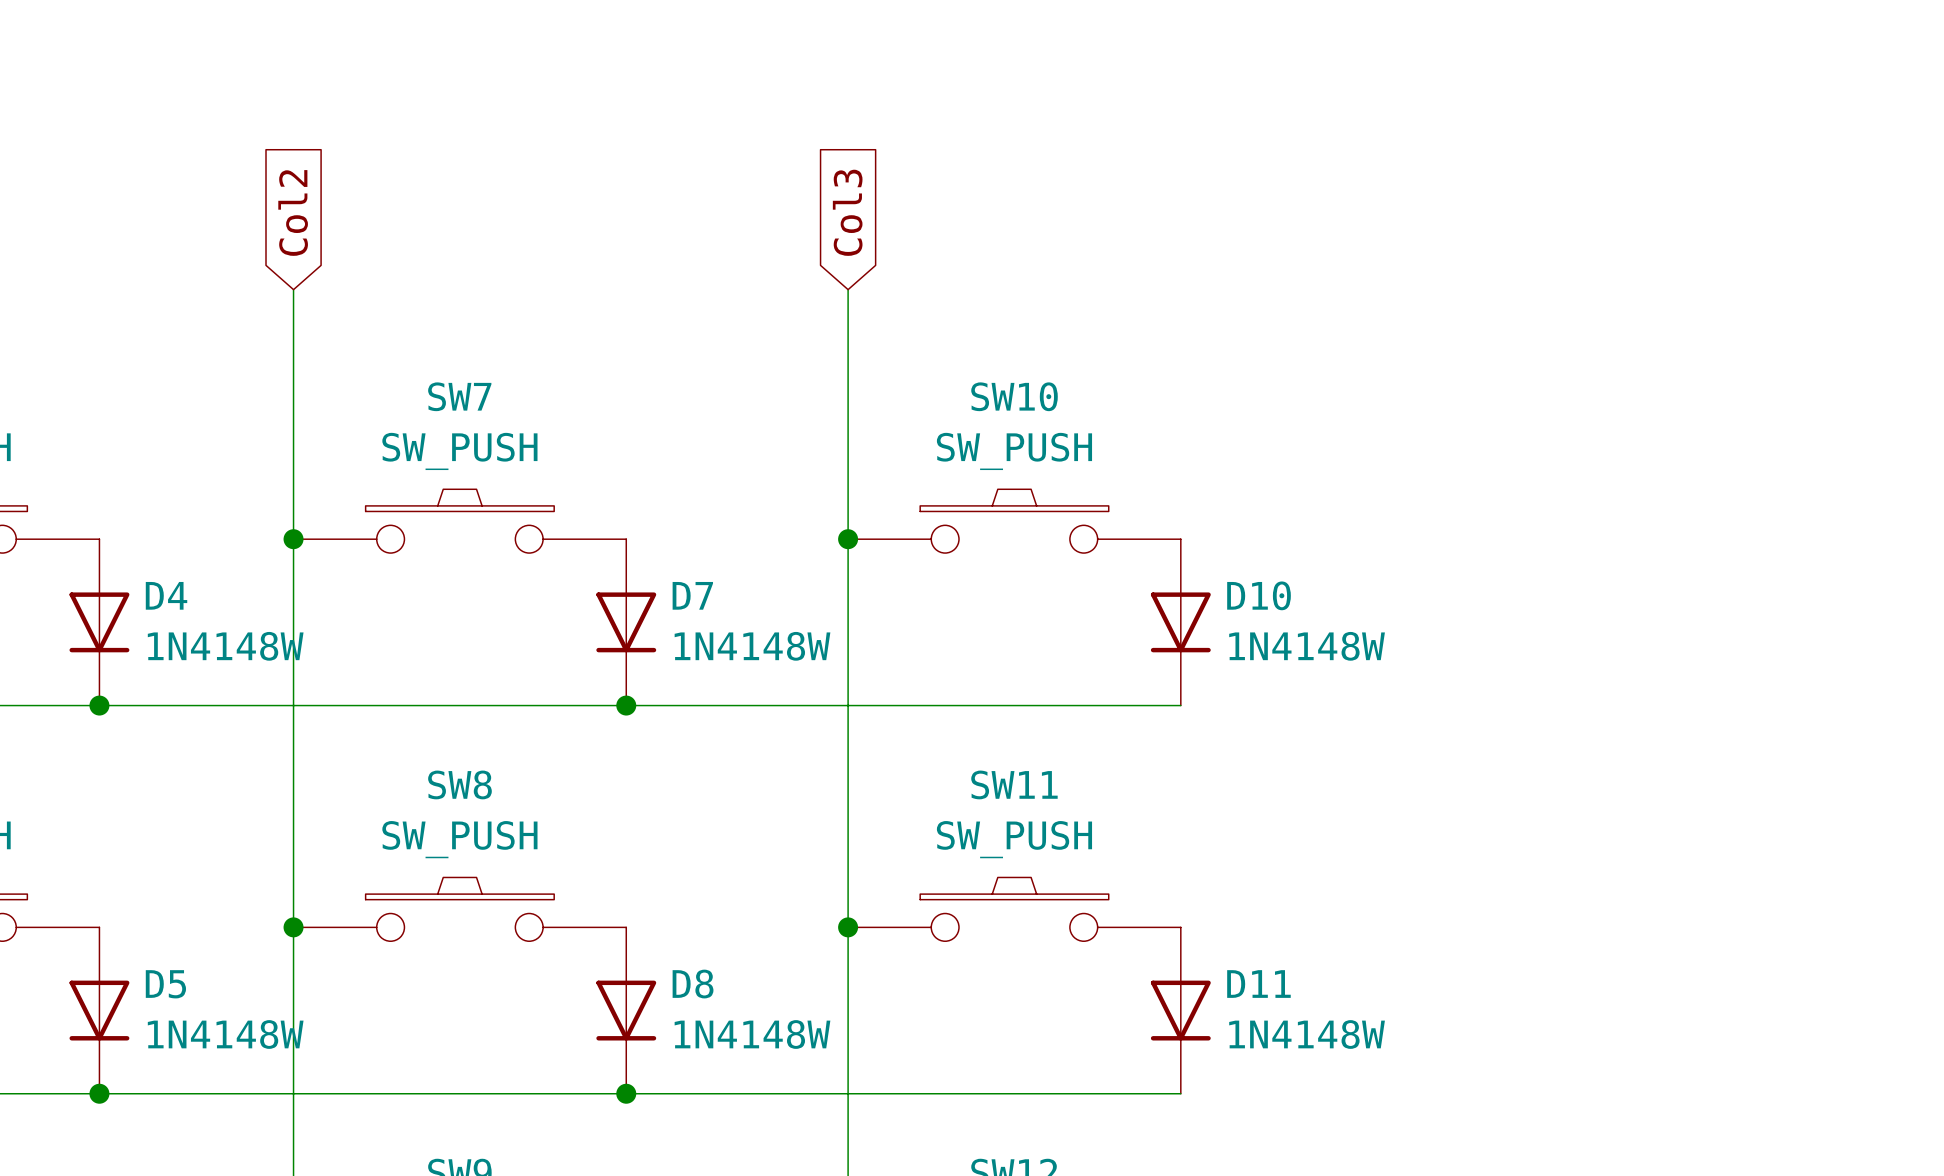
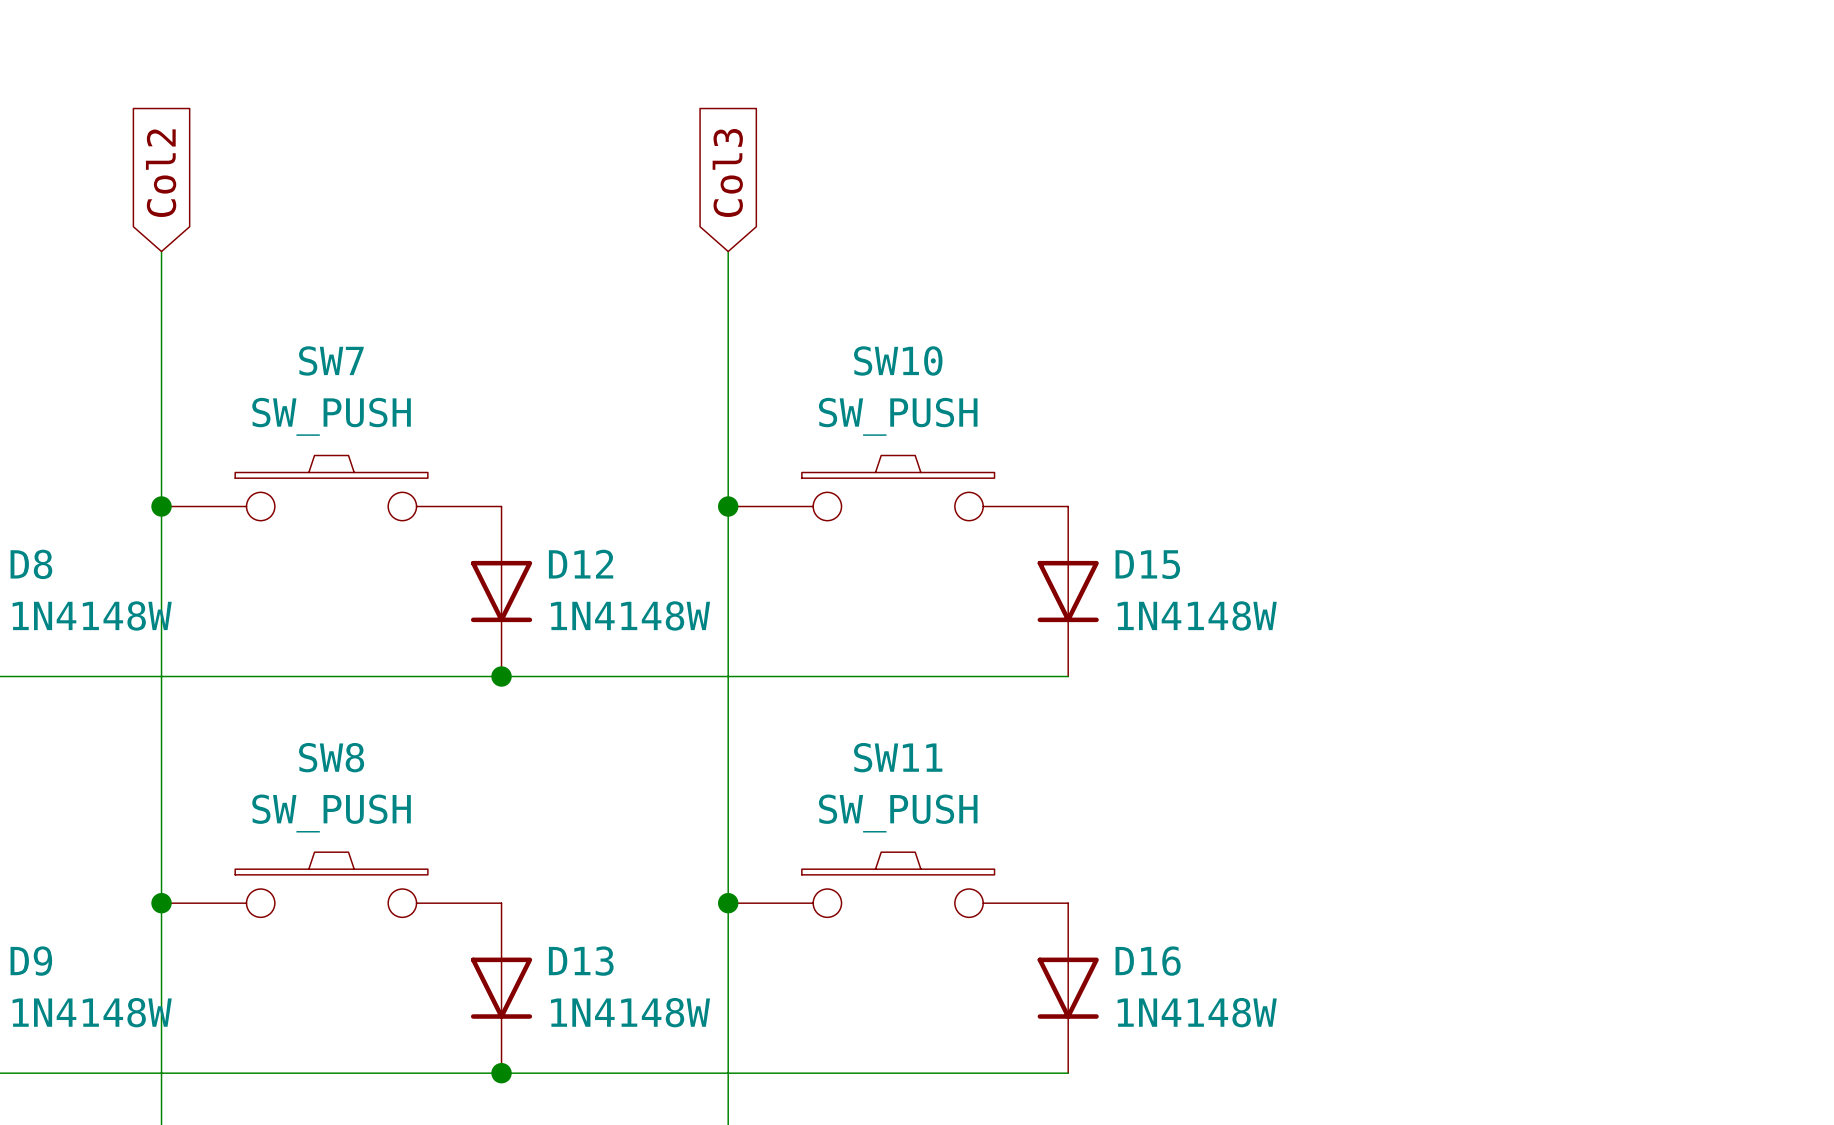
D4 name: D4 (166, 595) -> D8 (31, 564)
D7 name: D7 (692, 595) -> D12 (581, 564)
D10 name: D10 (1259, 595) -> D15 (1147, 564)
D5 name: D5 (165, 984) -> D9 (31, 961)
D8 name: D8 (693, 984) -> D13 (581, 961)
D11 name: D11 (1258, 984) -> D16 (1148, 961)

